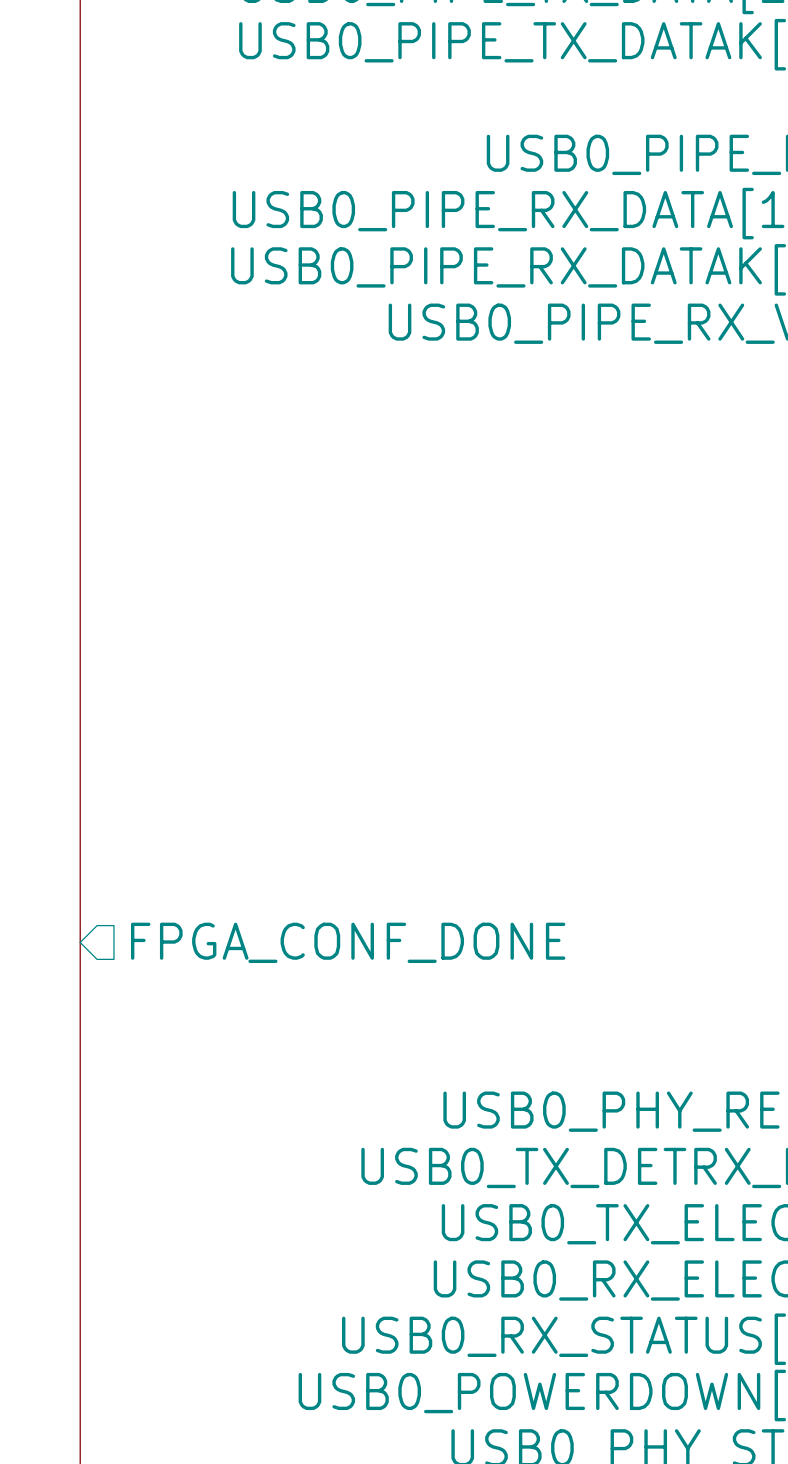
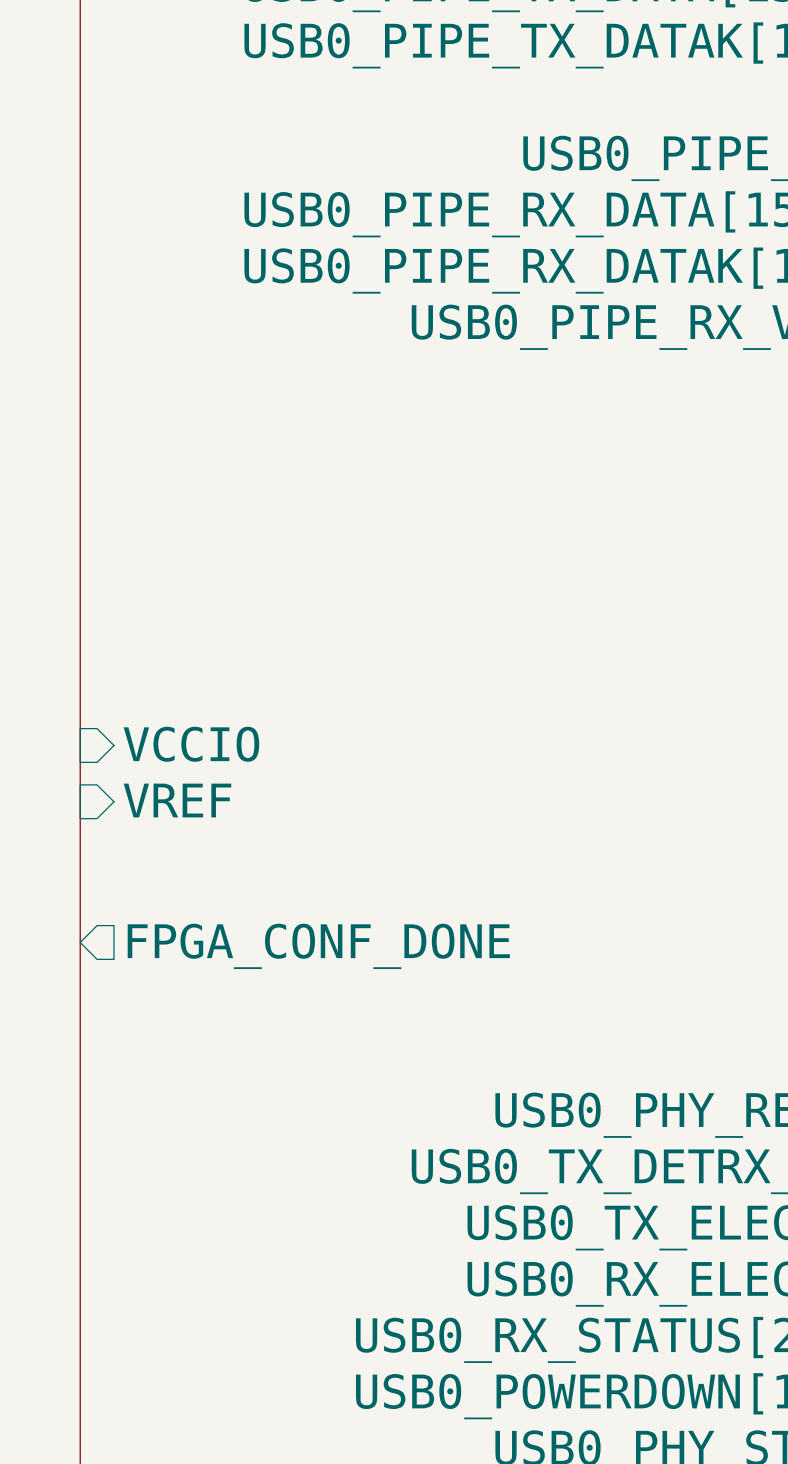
sheet pin: none -> VCCIO (191, 744)
sheet pin: none -> VREF (177, 800)

